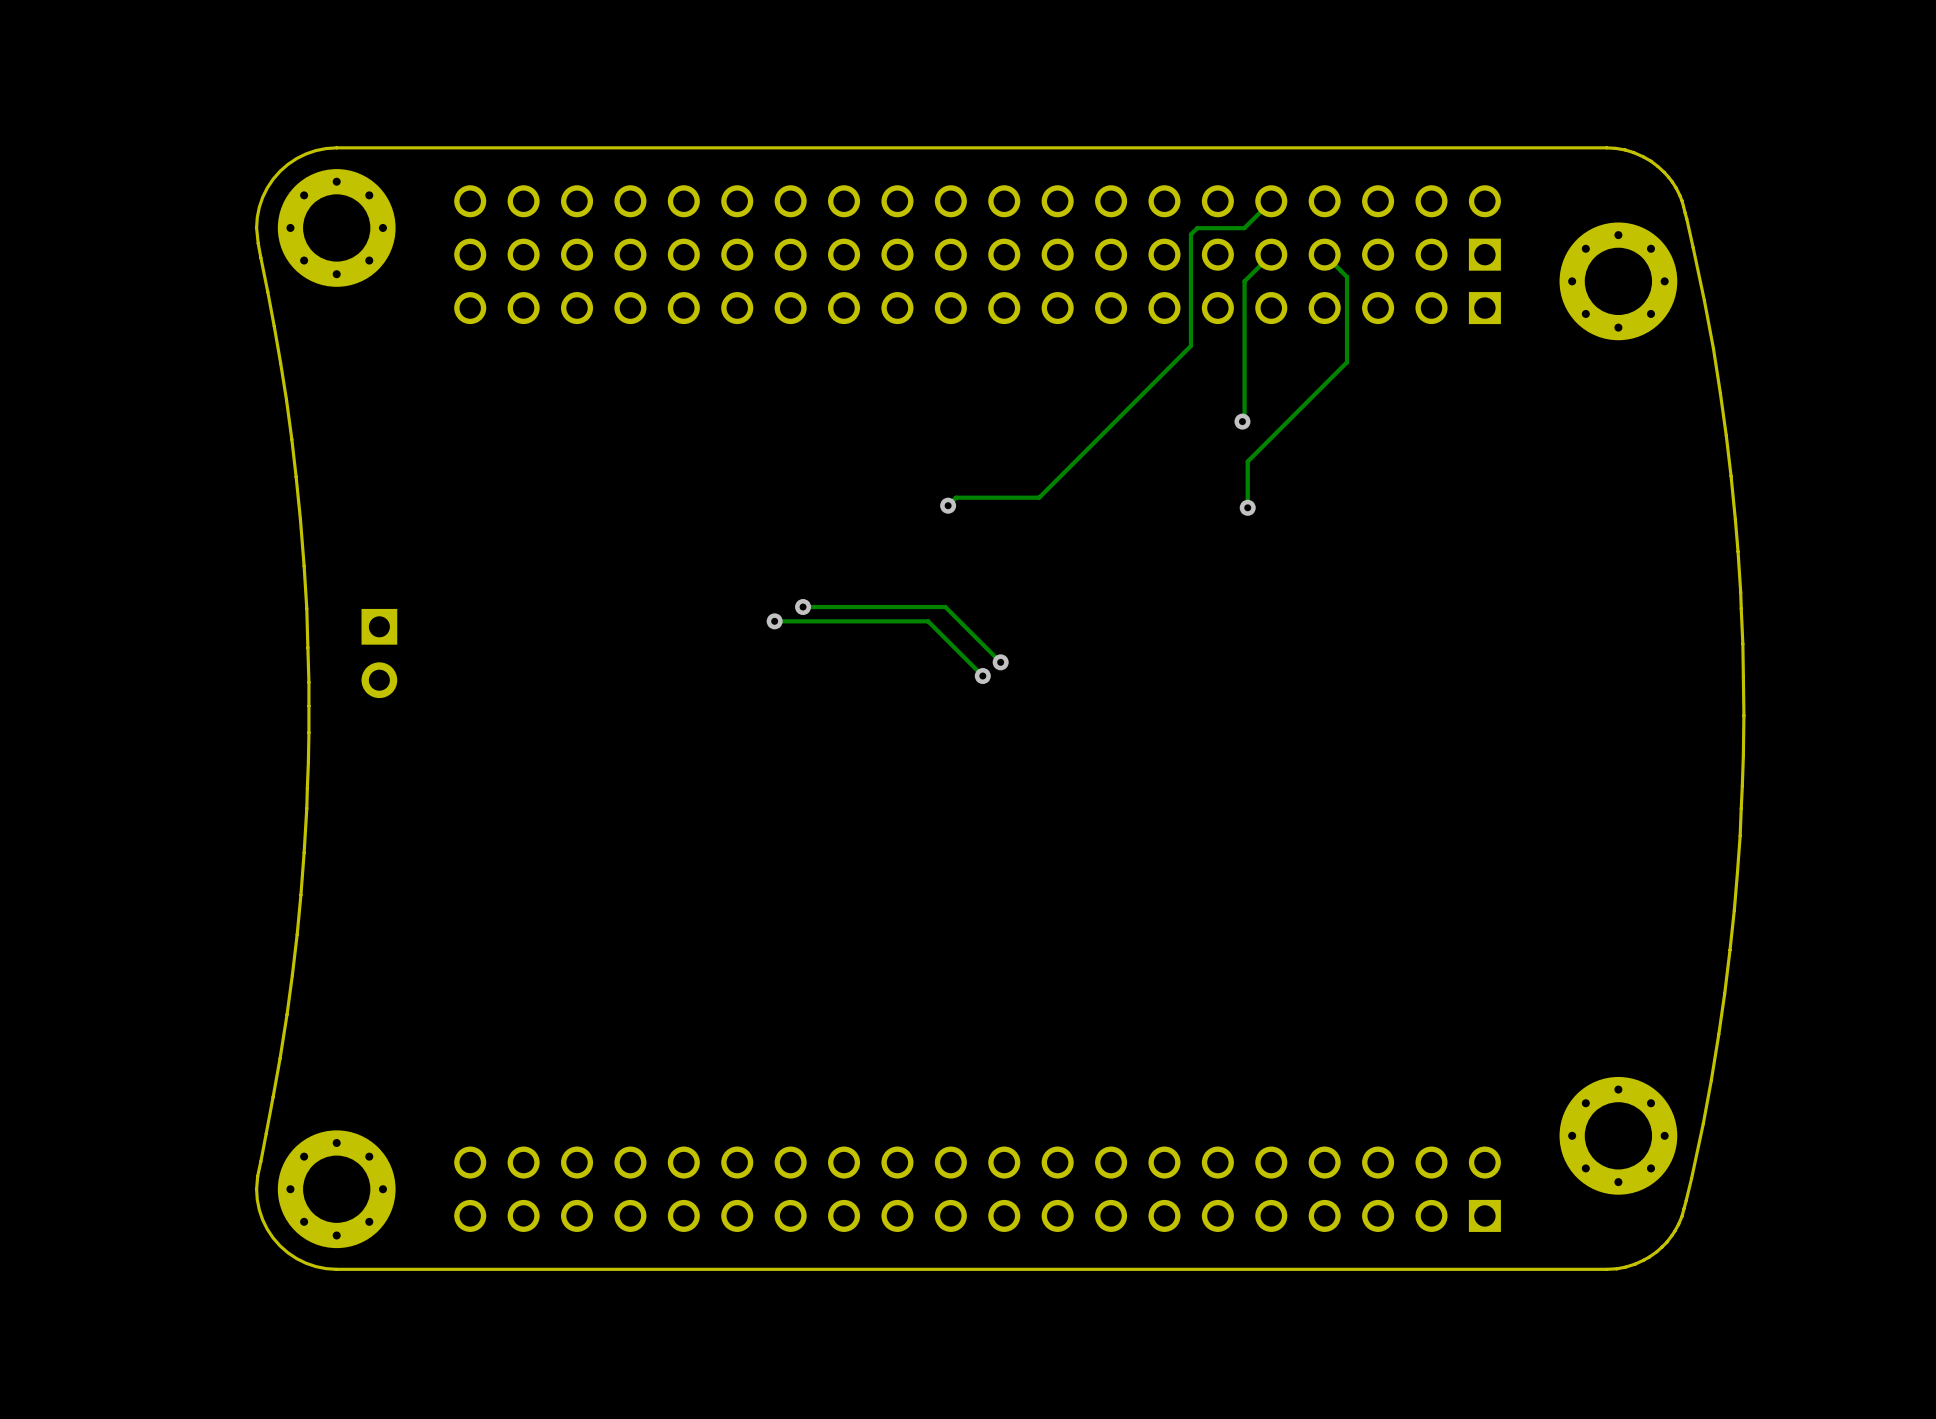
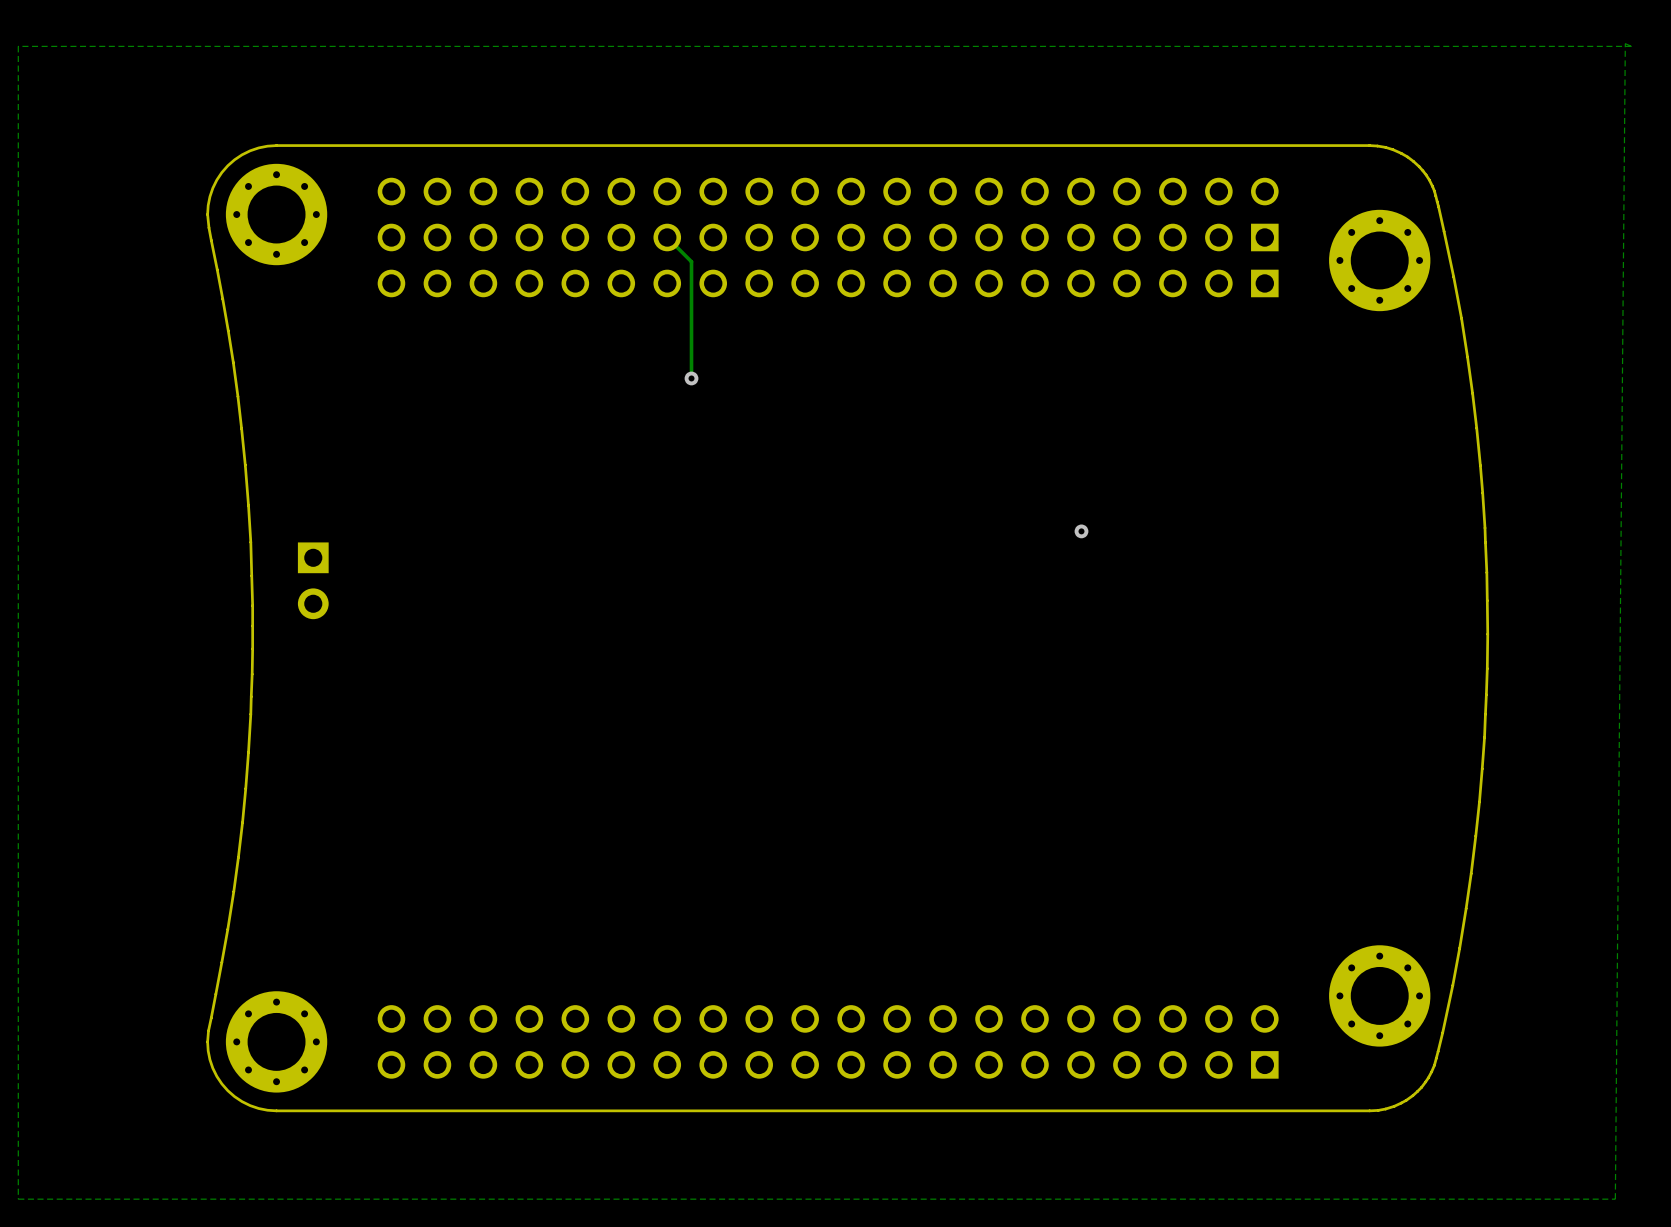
zone outline: none -> (1625, 43) (1625, 44) (1615, 1199) (18, 1199) (18, 46) (1631, 46) (1625, 43)
track: (1271, 201) (1244, 228) (1197, 228) (1190, 234) (1190, 345) (1039, 497) (956, 497) (948, 505) -> none
track: none -> (667, 237) (691, 261) (691, 378)
track: (1271, 254) (1244, 281) (1244, 419) (1242, 421) -> none
track: (1324, 254) (1347, 276) (1347, 362) (1247, 461) (1247, 507) -> none
via: none -> (691, 378)
via: (1242, 421) -> none
via: (948, 505) -> none
via: (1247, 507) -> none
via: none -> (1081, 531)
track: (803, 607) (945, 607) (1000, 662) -> none
via: (803, 607) -> none
track: (774, 621) (928, 621) (982, 676) -> none
via: (774, 621) -> none
via: (1000, 662) -> none
via: (982, 676) -> none

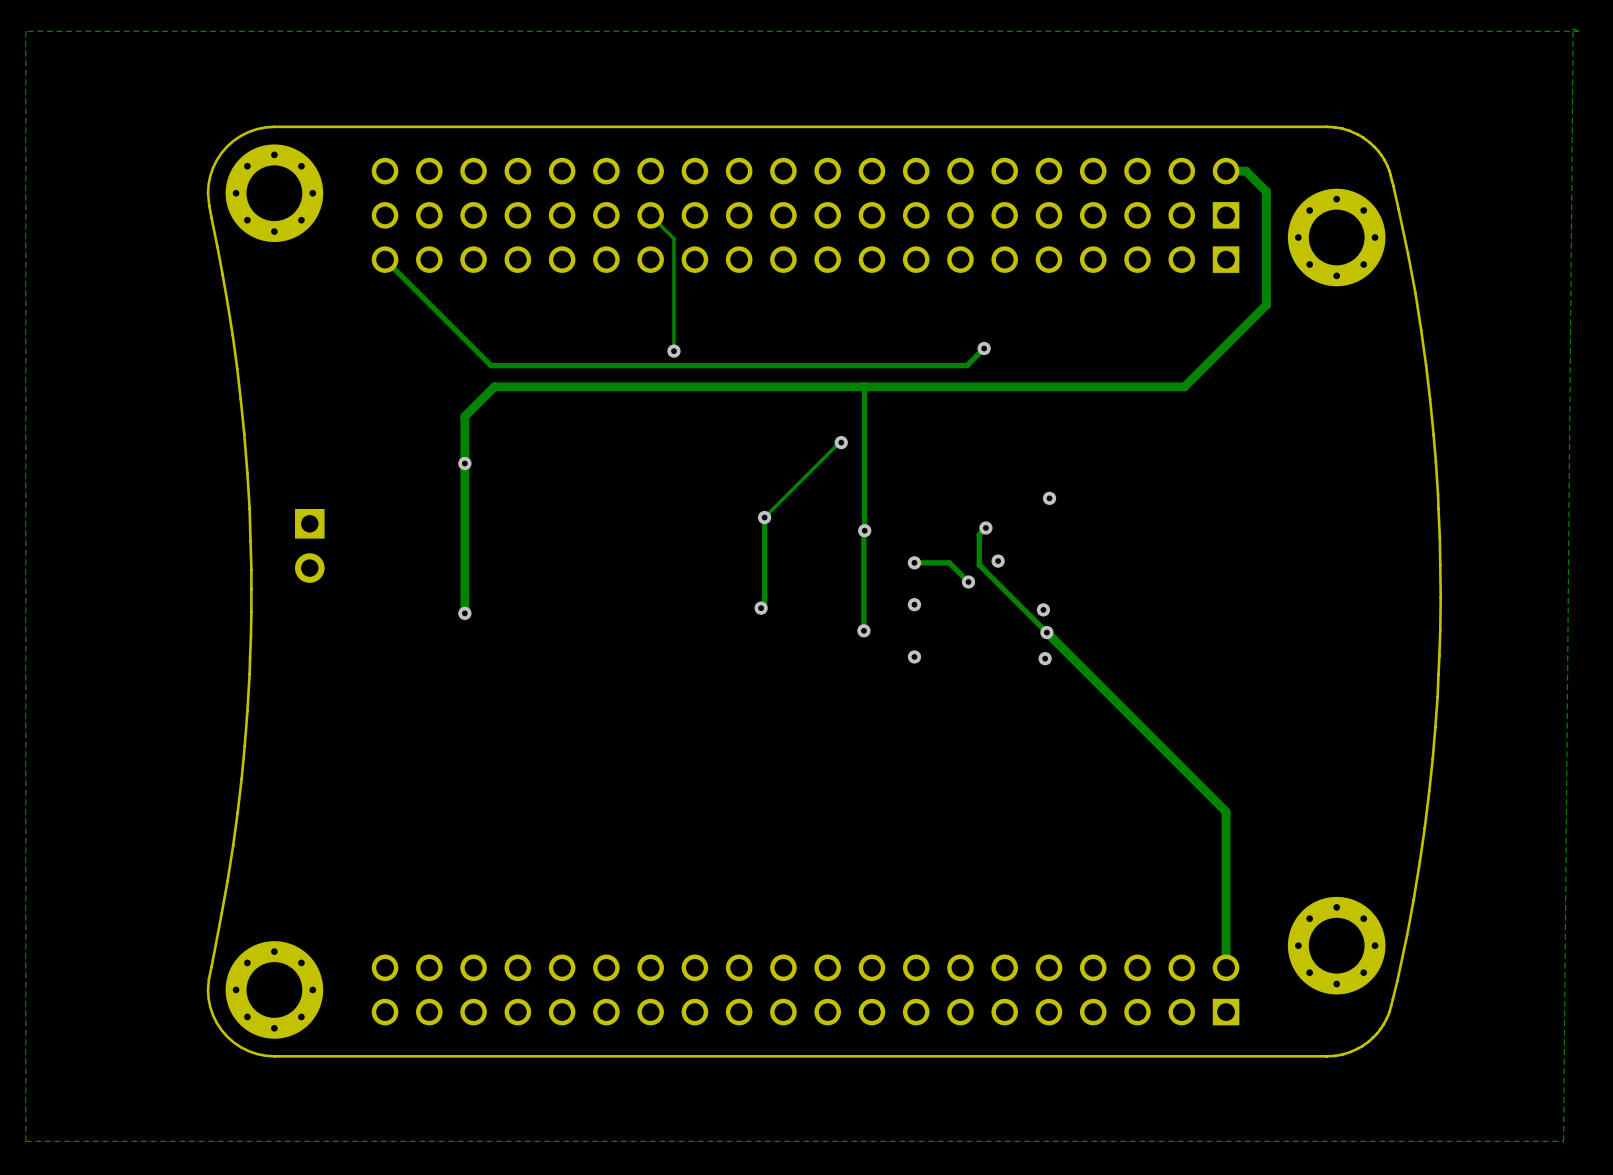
track: none -> (1226, 171) (1245, 171) (1266, 191) (1266, 304) (1184, 386) (494, 386) (464, 416) (464, 613)
track: none -> (385, 259) (491, 365) (967, 365) (984, 348)
via: none -> (984, 348)
track: none -> (863, 386) (863, 630)
track: none -> (841, 442) (764, 517) (764, 604) (761, 608)
via: none -> (841, 442)
via: none -> (464, 463)
via: none -> (764, 517)
track: none -> (985, 527) (979, 534) (979, 564) (1226, 811) (1226, 967)
via: none -> (985, 527)
via: none -> (864, 530)
via: none -> (998, 561)
track: none -> (914, 562) (949, 562) (968, 582)
via: none -> (914, 562)
via: none -> (968, 582)
via: none -> (914, 604)
via: none -> (761, 608)
via: none -> (1043, 609)
via: none -> (464, 613)
via: none -> (863, 630)
via: none -> (1046, 632)
via: none -> (914, 656)
via: none -> (1045, 658)

